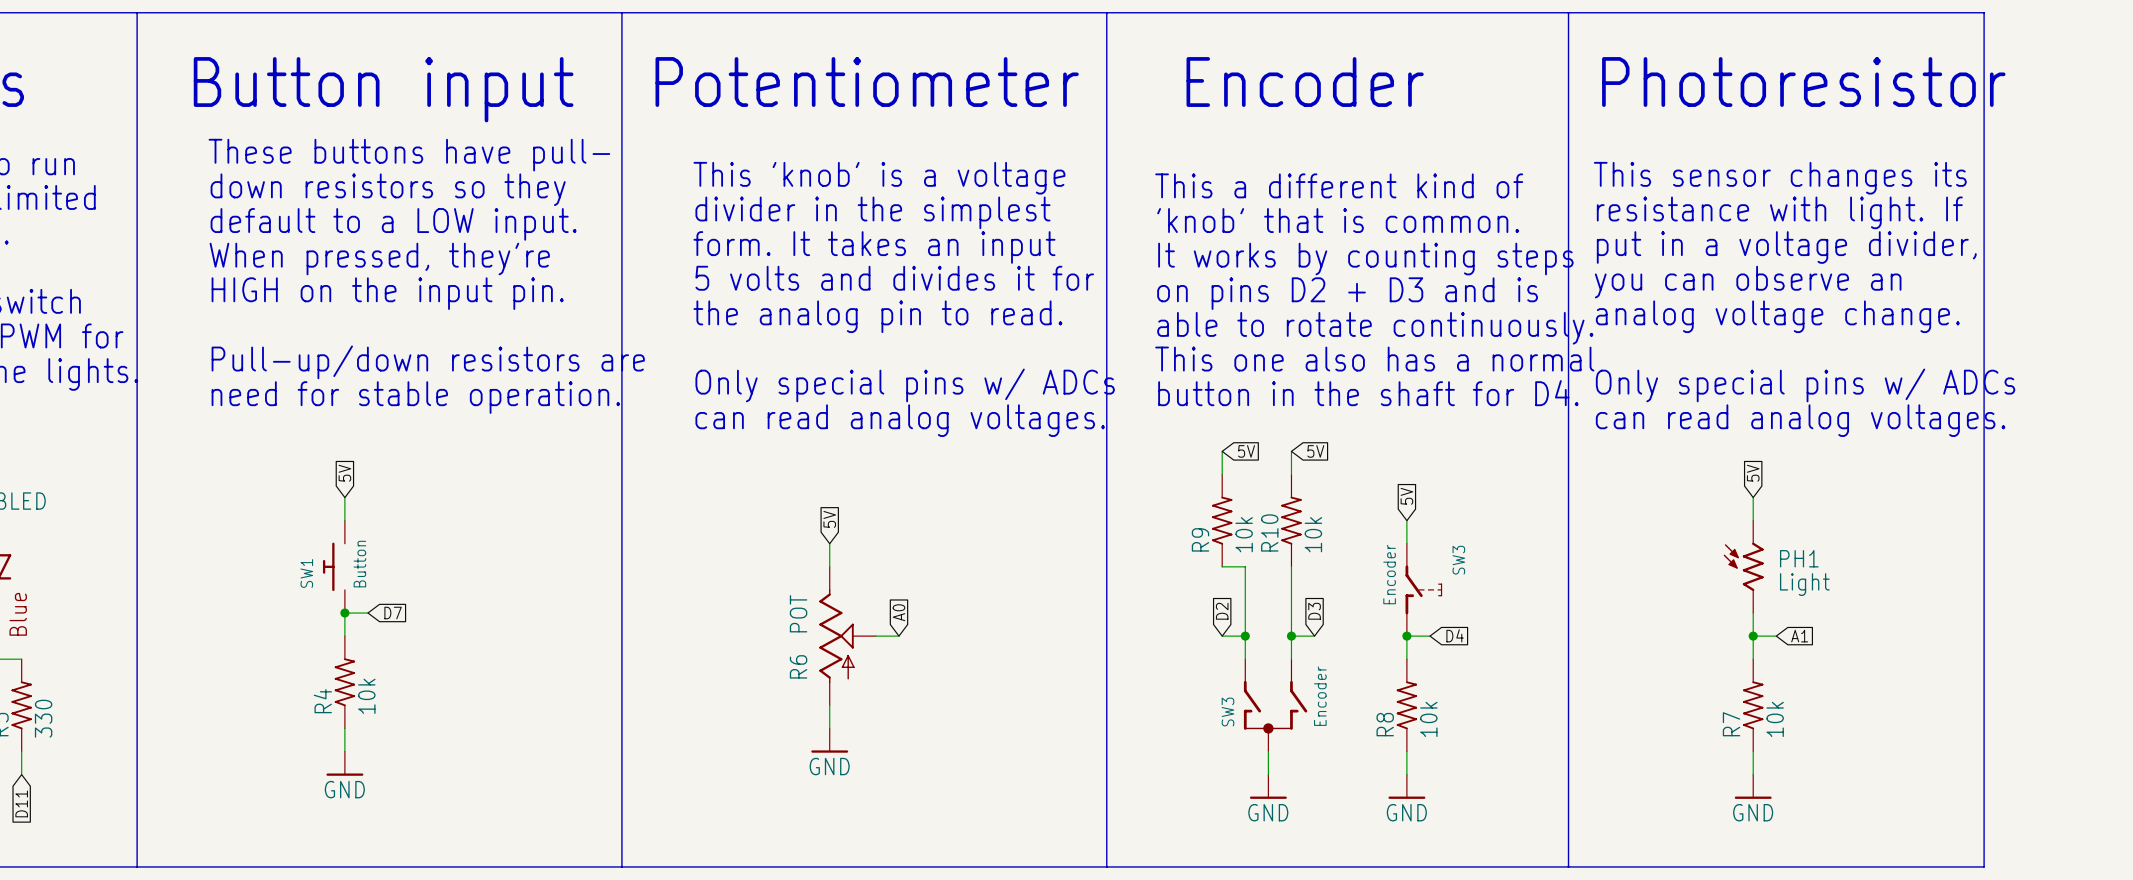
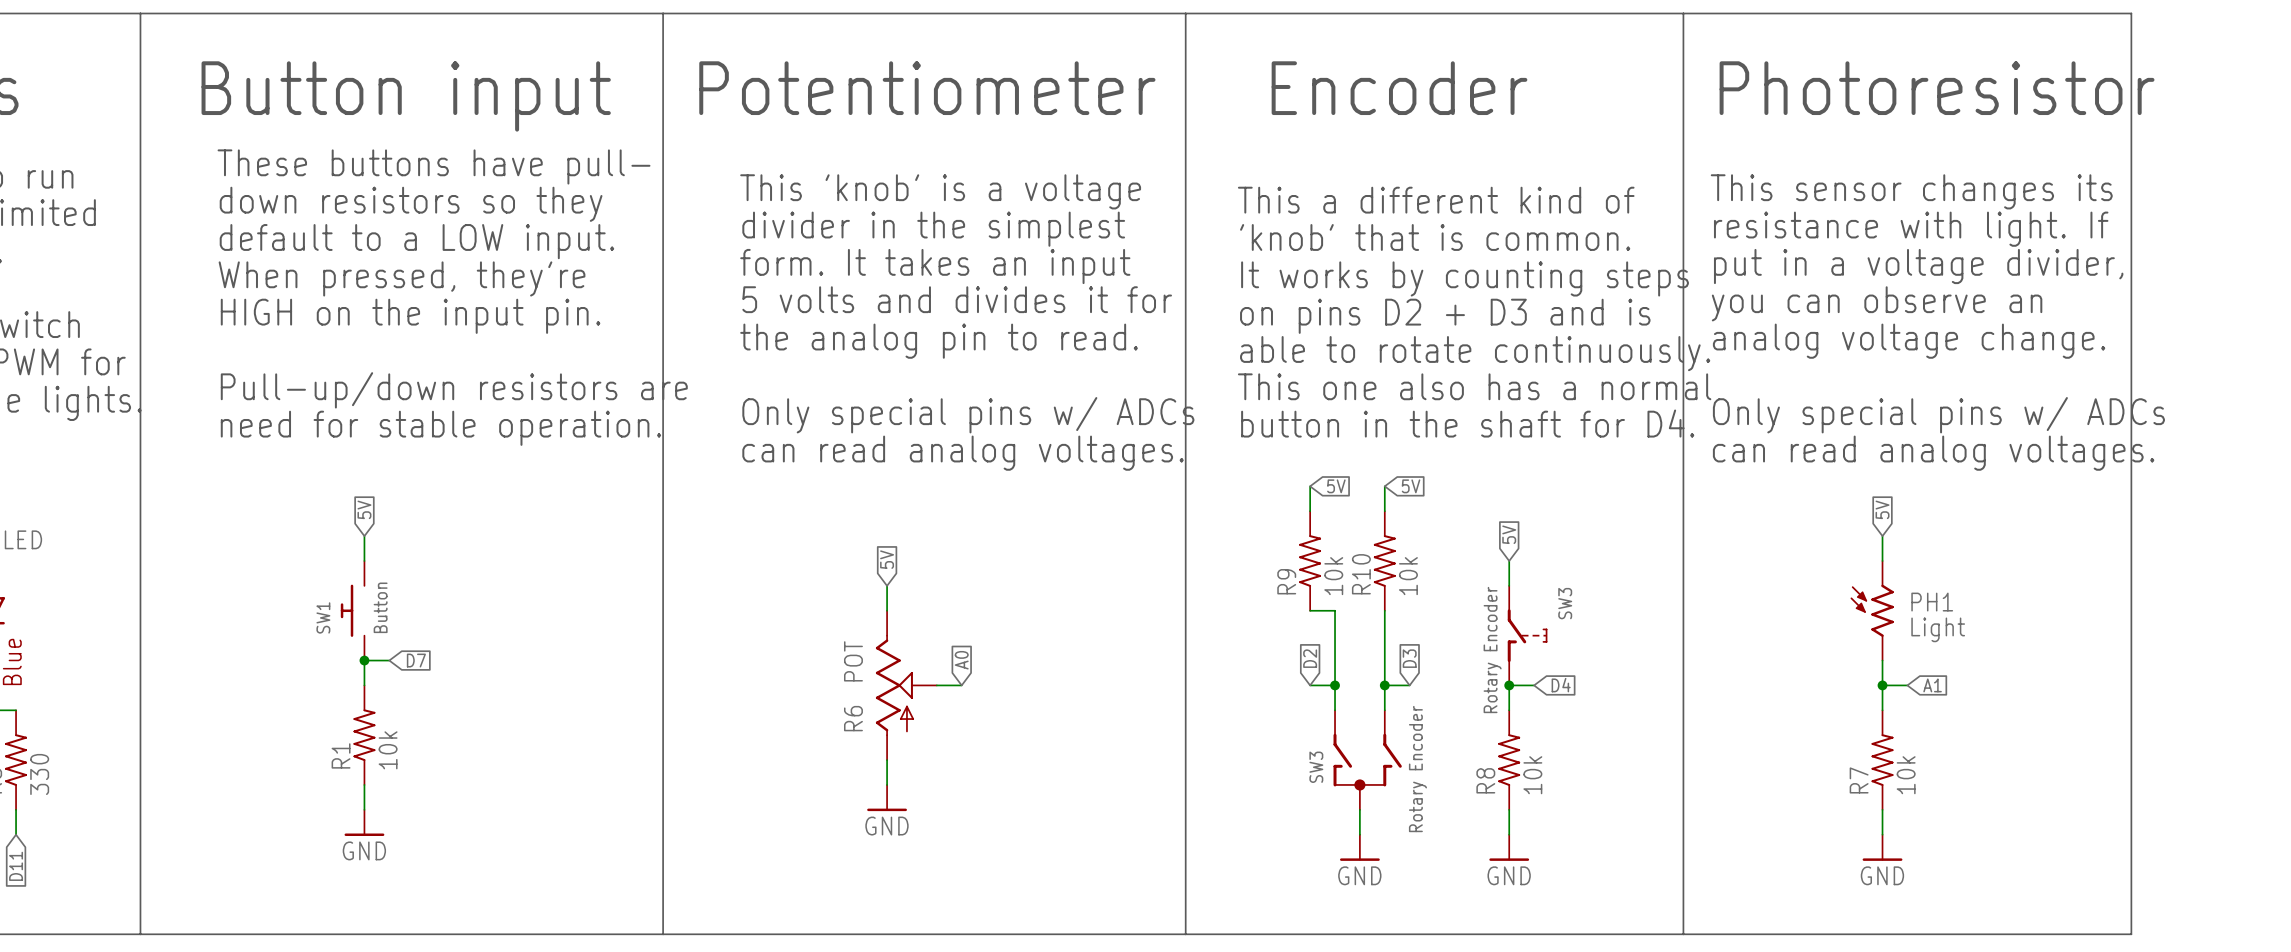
SW3 value: Encoder (1389, 574) -> Rotary Encoder (1492, 650)
SW3 value: Encoder (1320, 696) -> Rotary Encoder (1417, 769)
R4 name: R4 (322, 701) -> R1 (341, 755)

